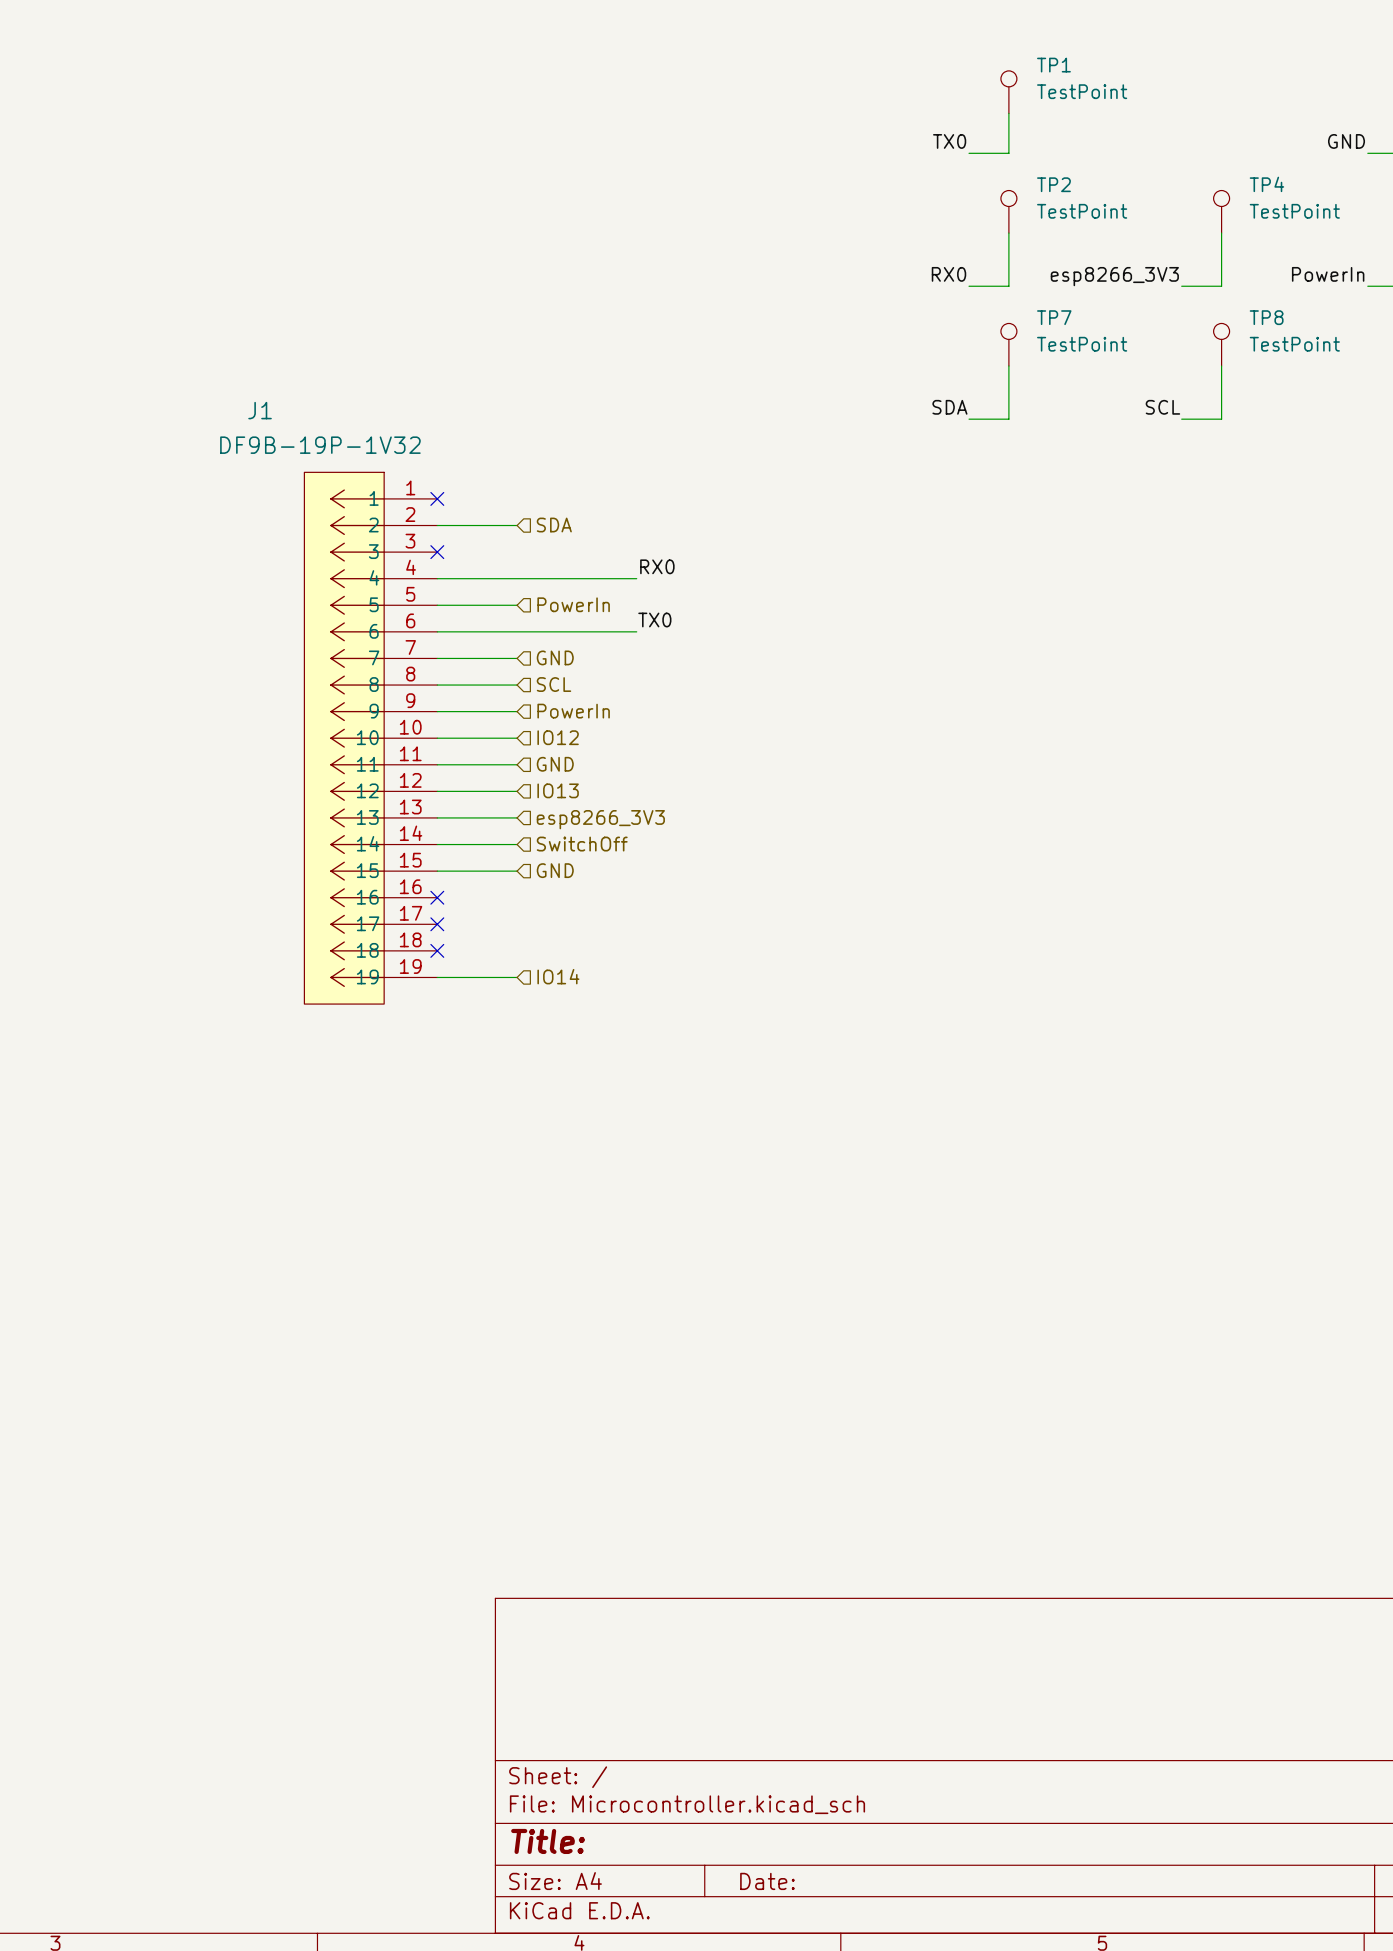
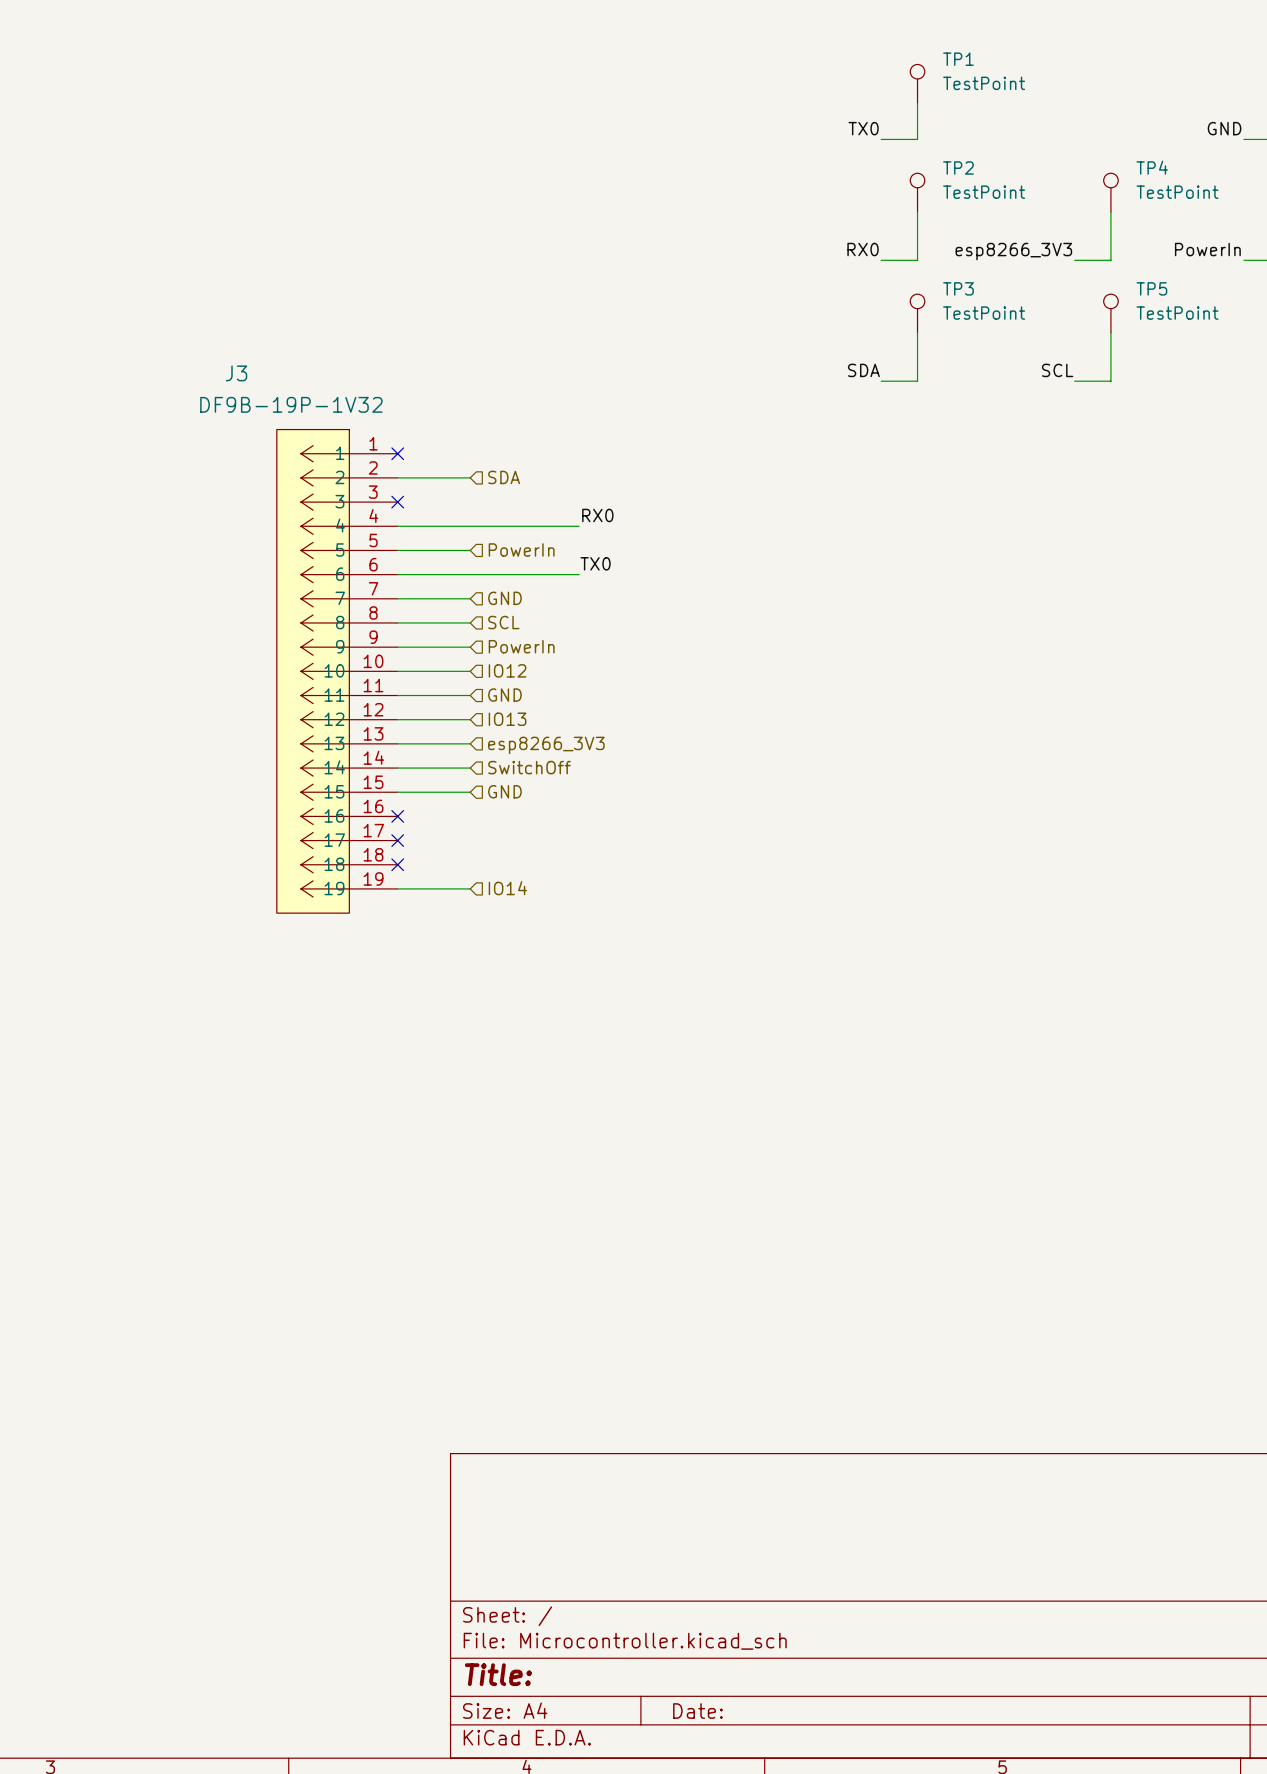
TP7 name: TP7 (1054, 317) -> TP3 (958, 288)
TP8 name: TP8 (1266, 317) -> TP5 (1151, 288)
J1 name: J1 (260, 410) -> J3 (236, 373)

